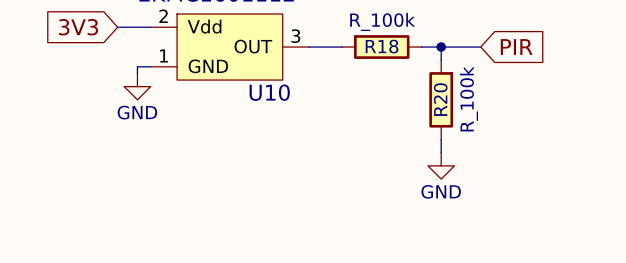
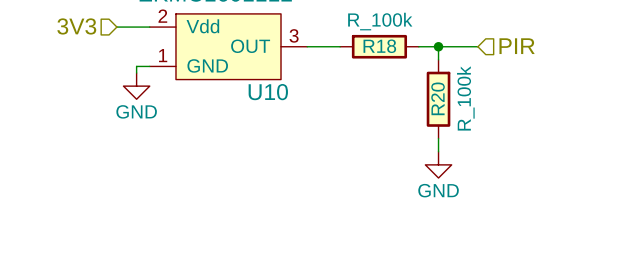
hierarchical label: none -> 3V3 (76, 26)
global label: 3V3 (78, 27) -> none
hierarchical label: none -> PIR (517, 46)
global label: PIR (516, 47) -> none

